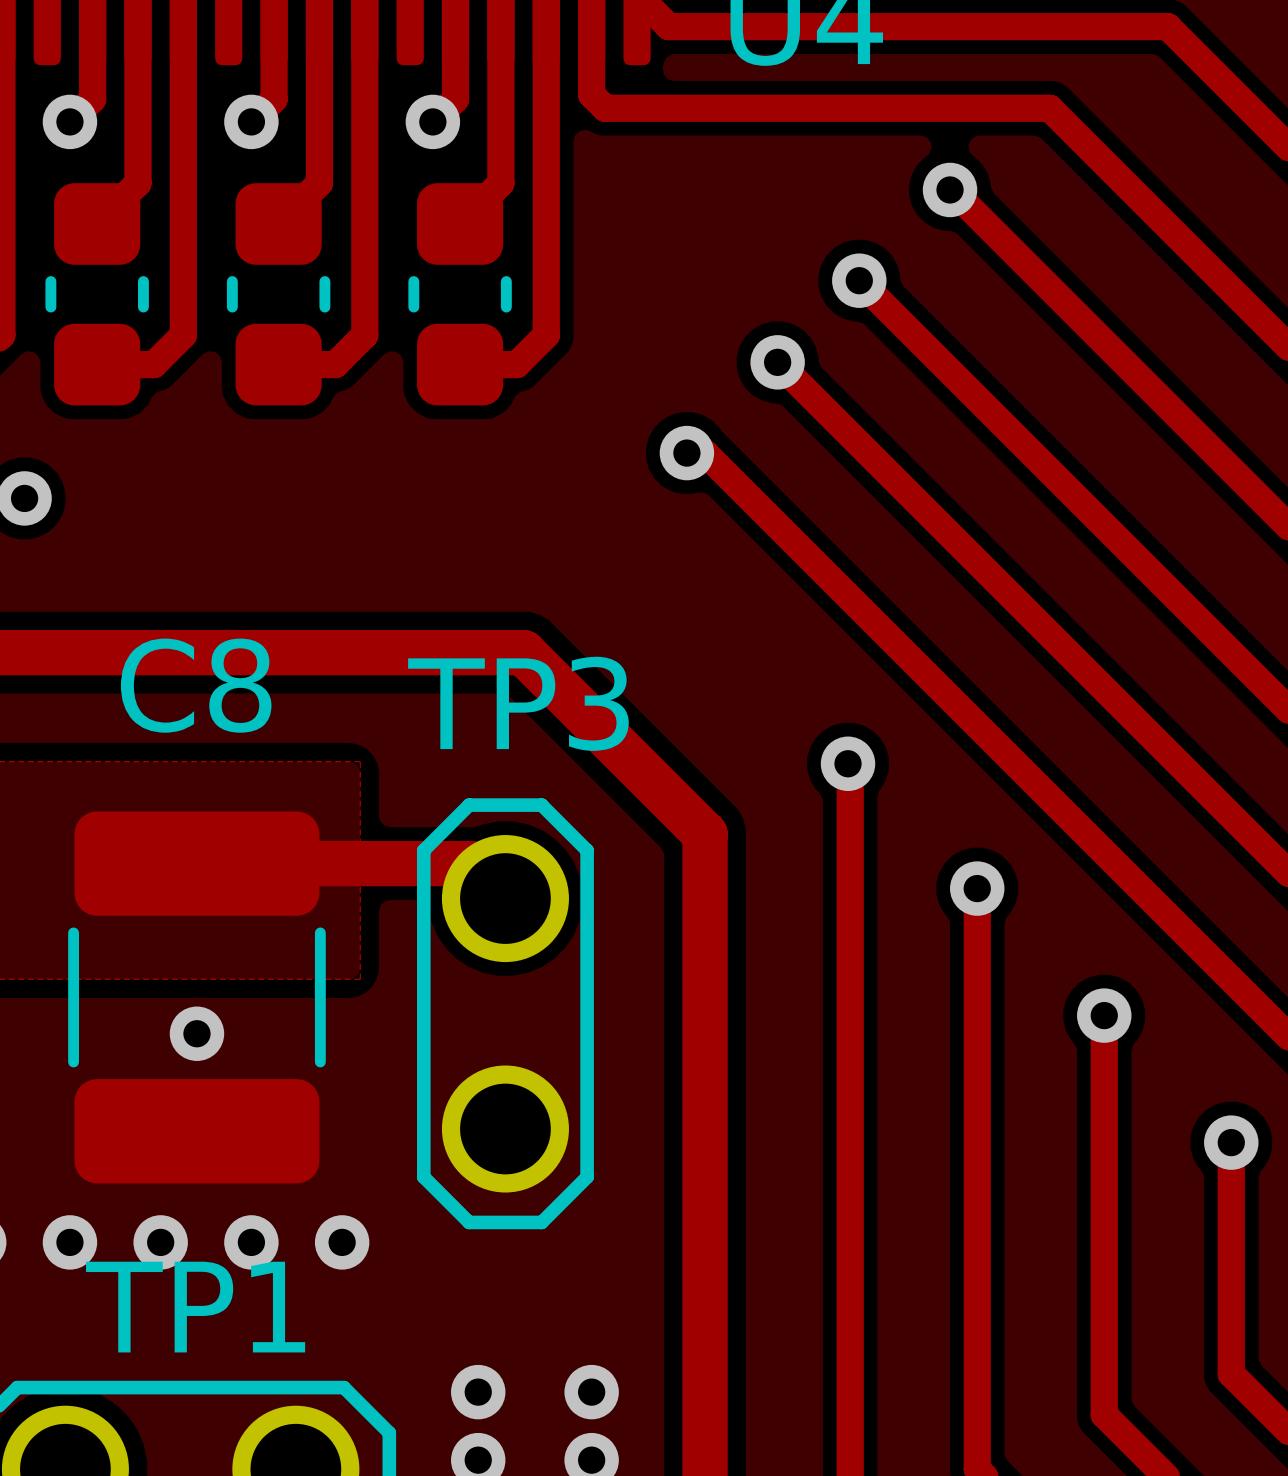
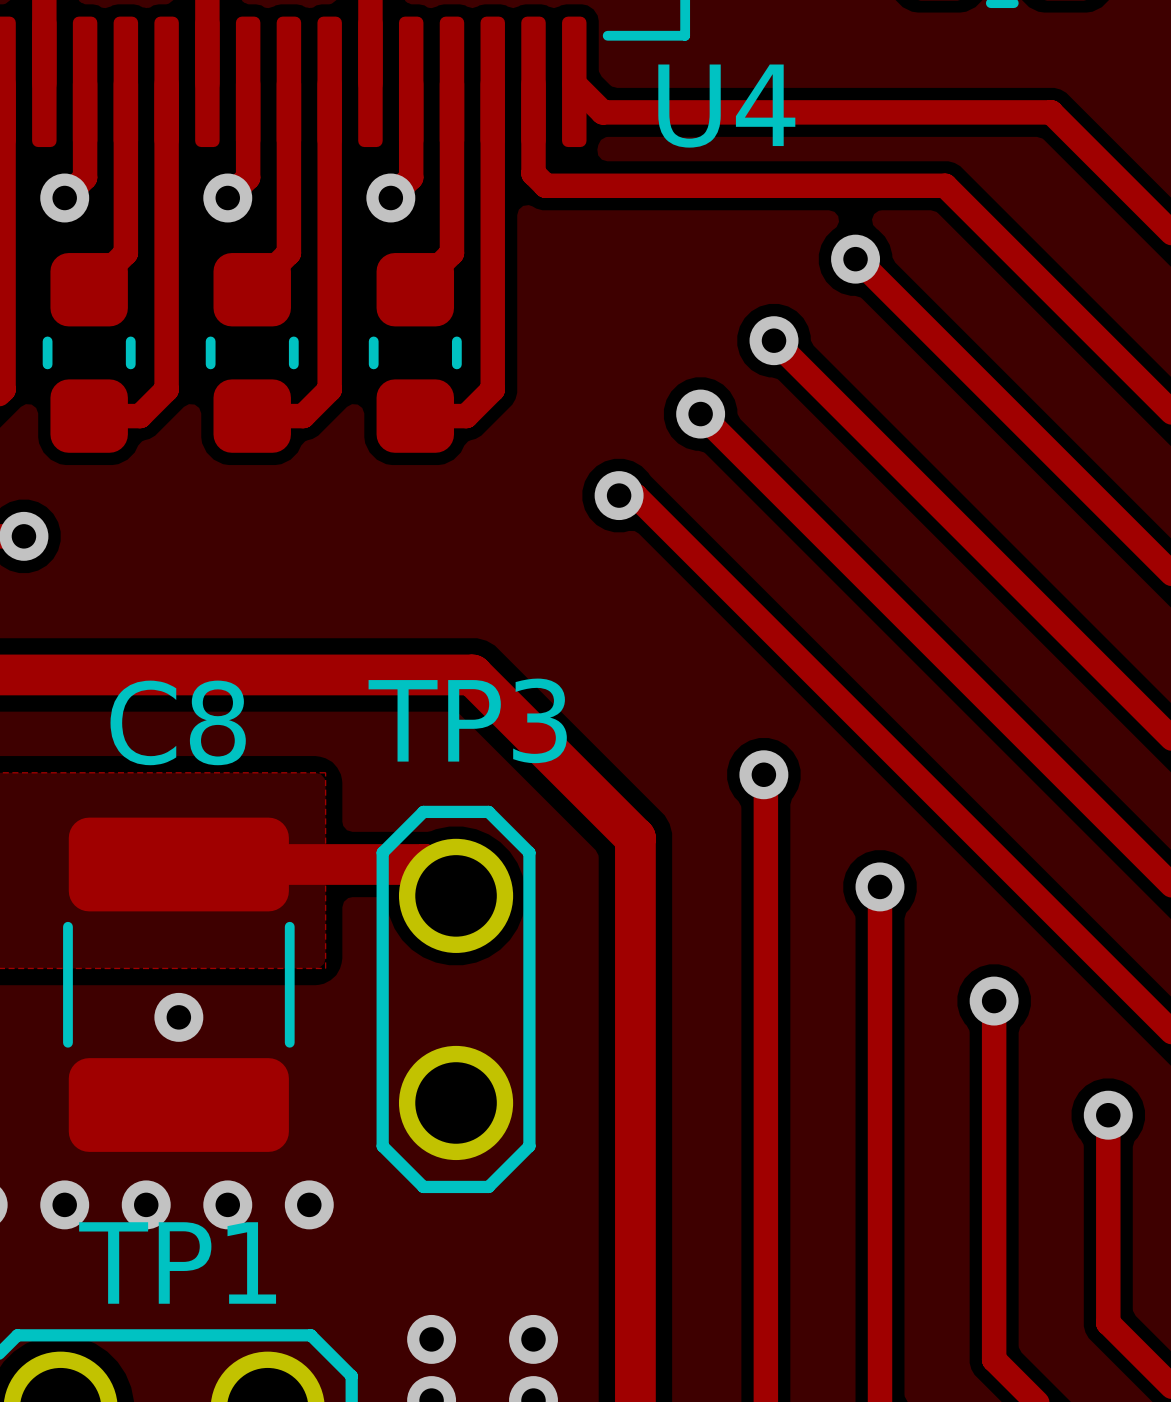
C8 name position: C8 (196, 685) -> C8 (178, 722)

